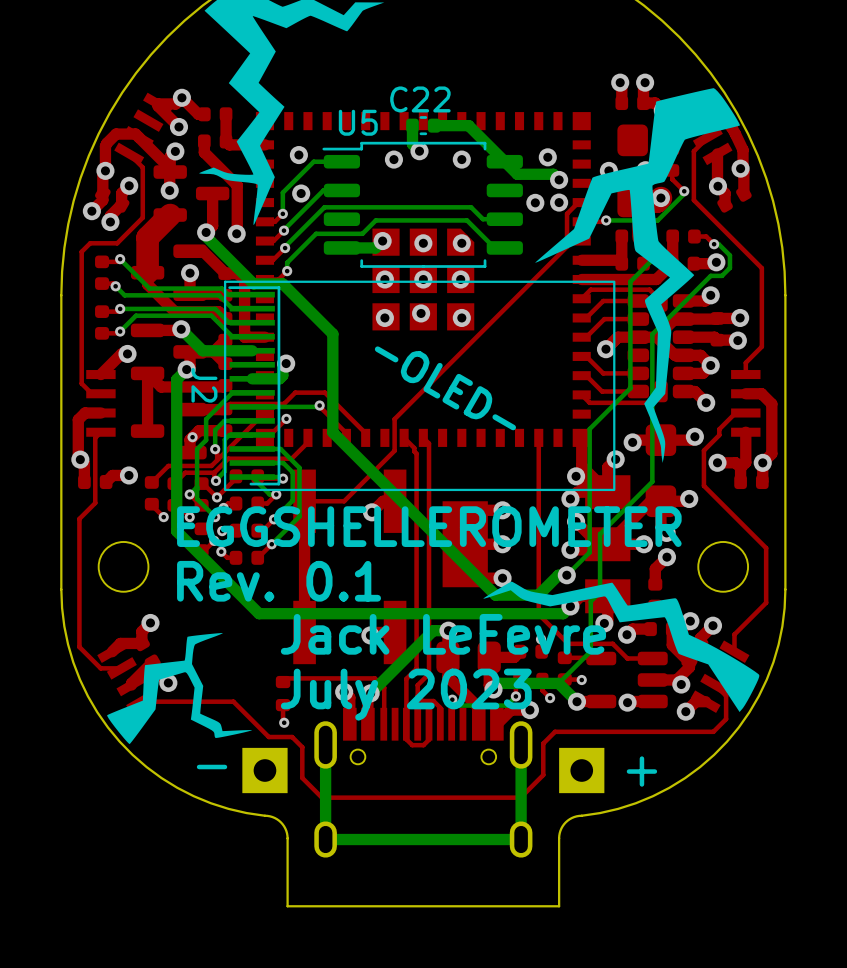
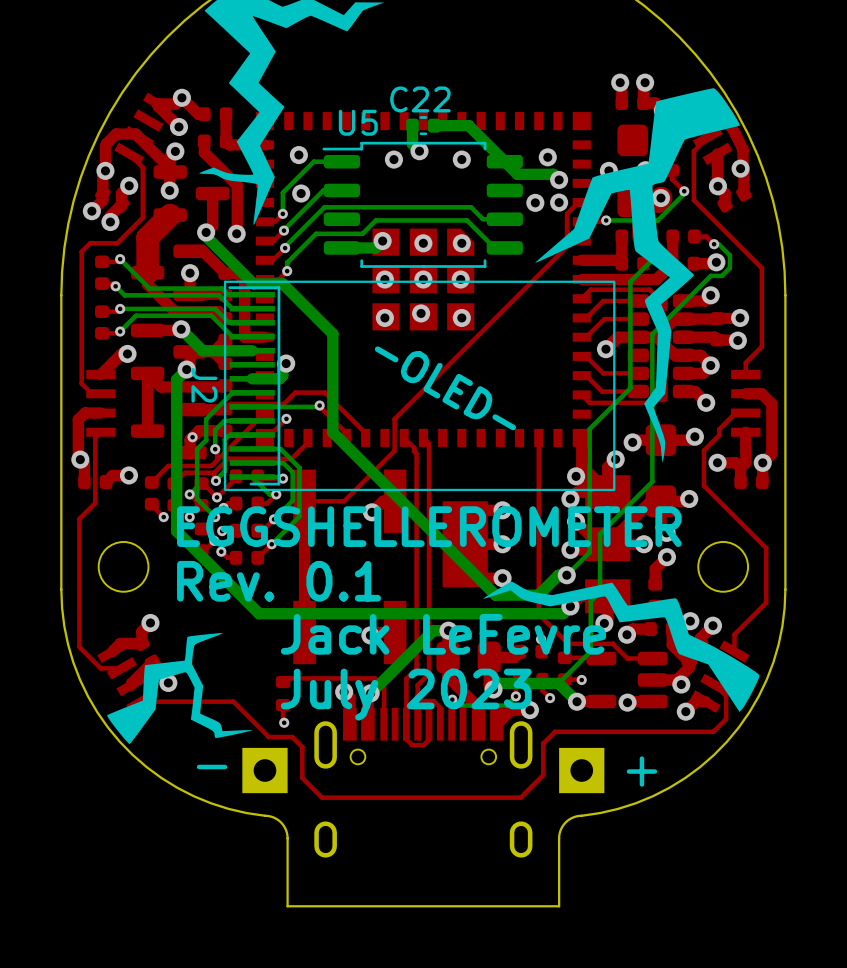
bottom track: (521, 744) (521, 839) (325, 839) (325, 744) -> none

